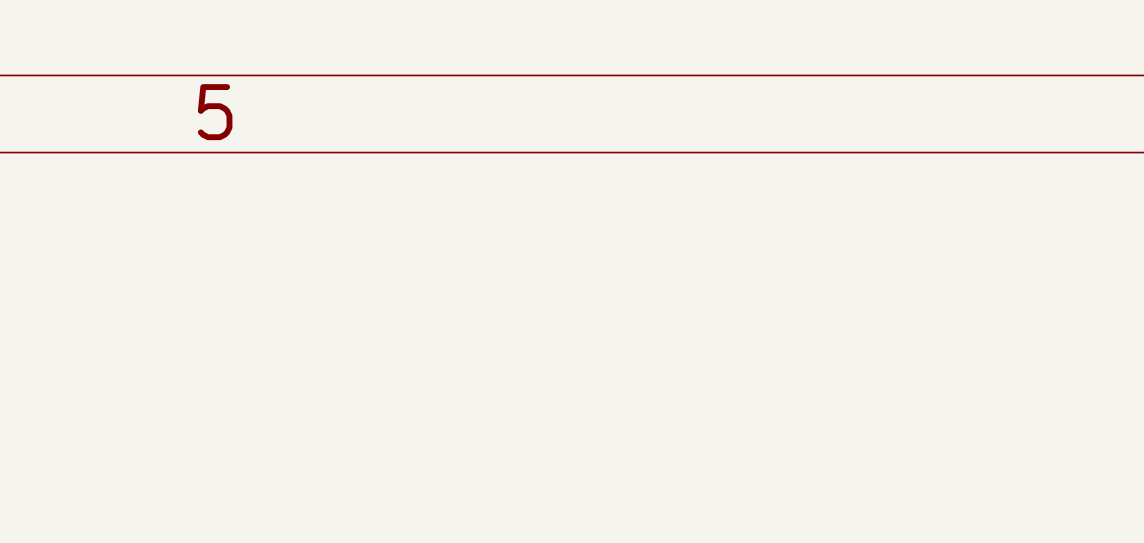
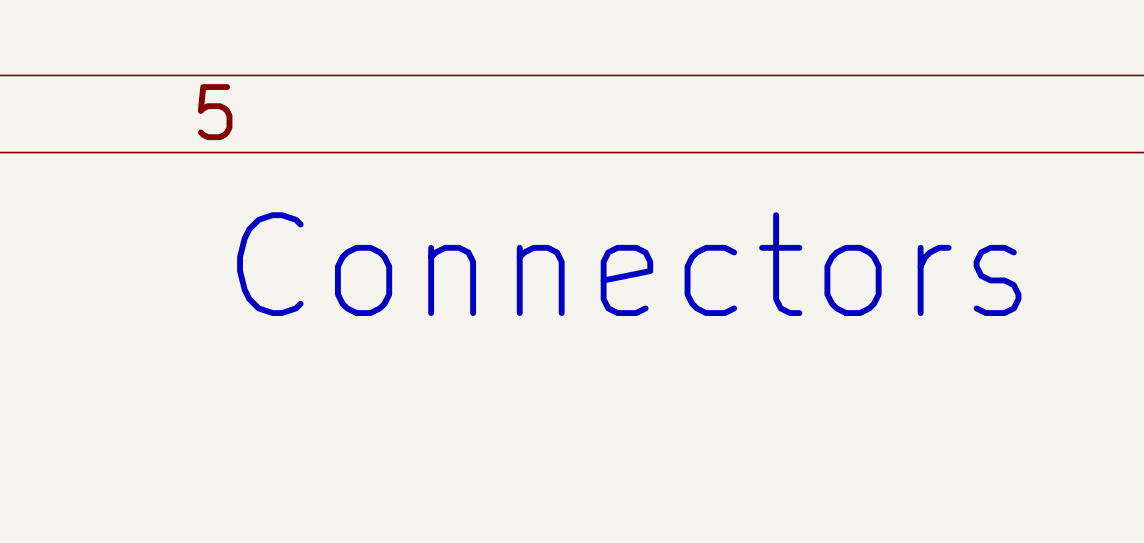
text: none -> Connectors (629, 264)

